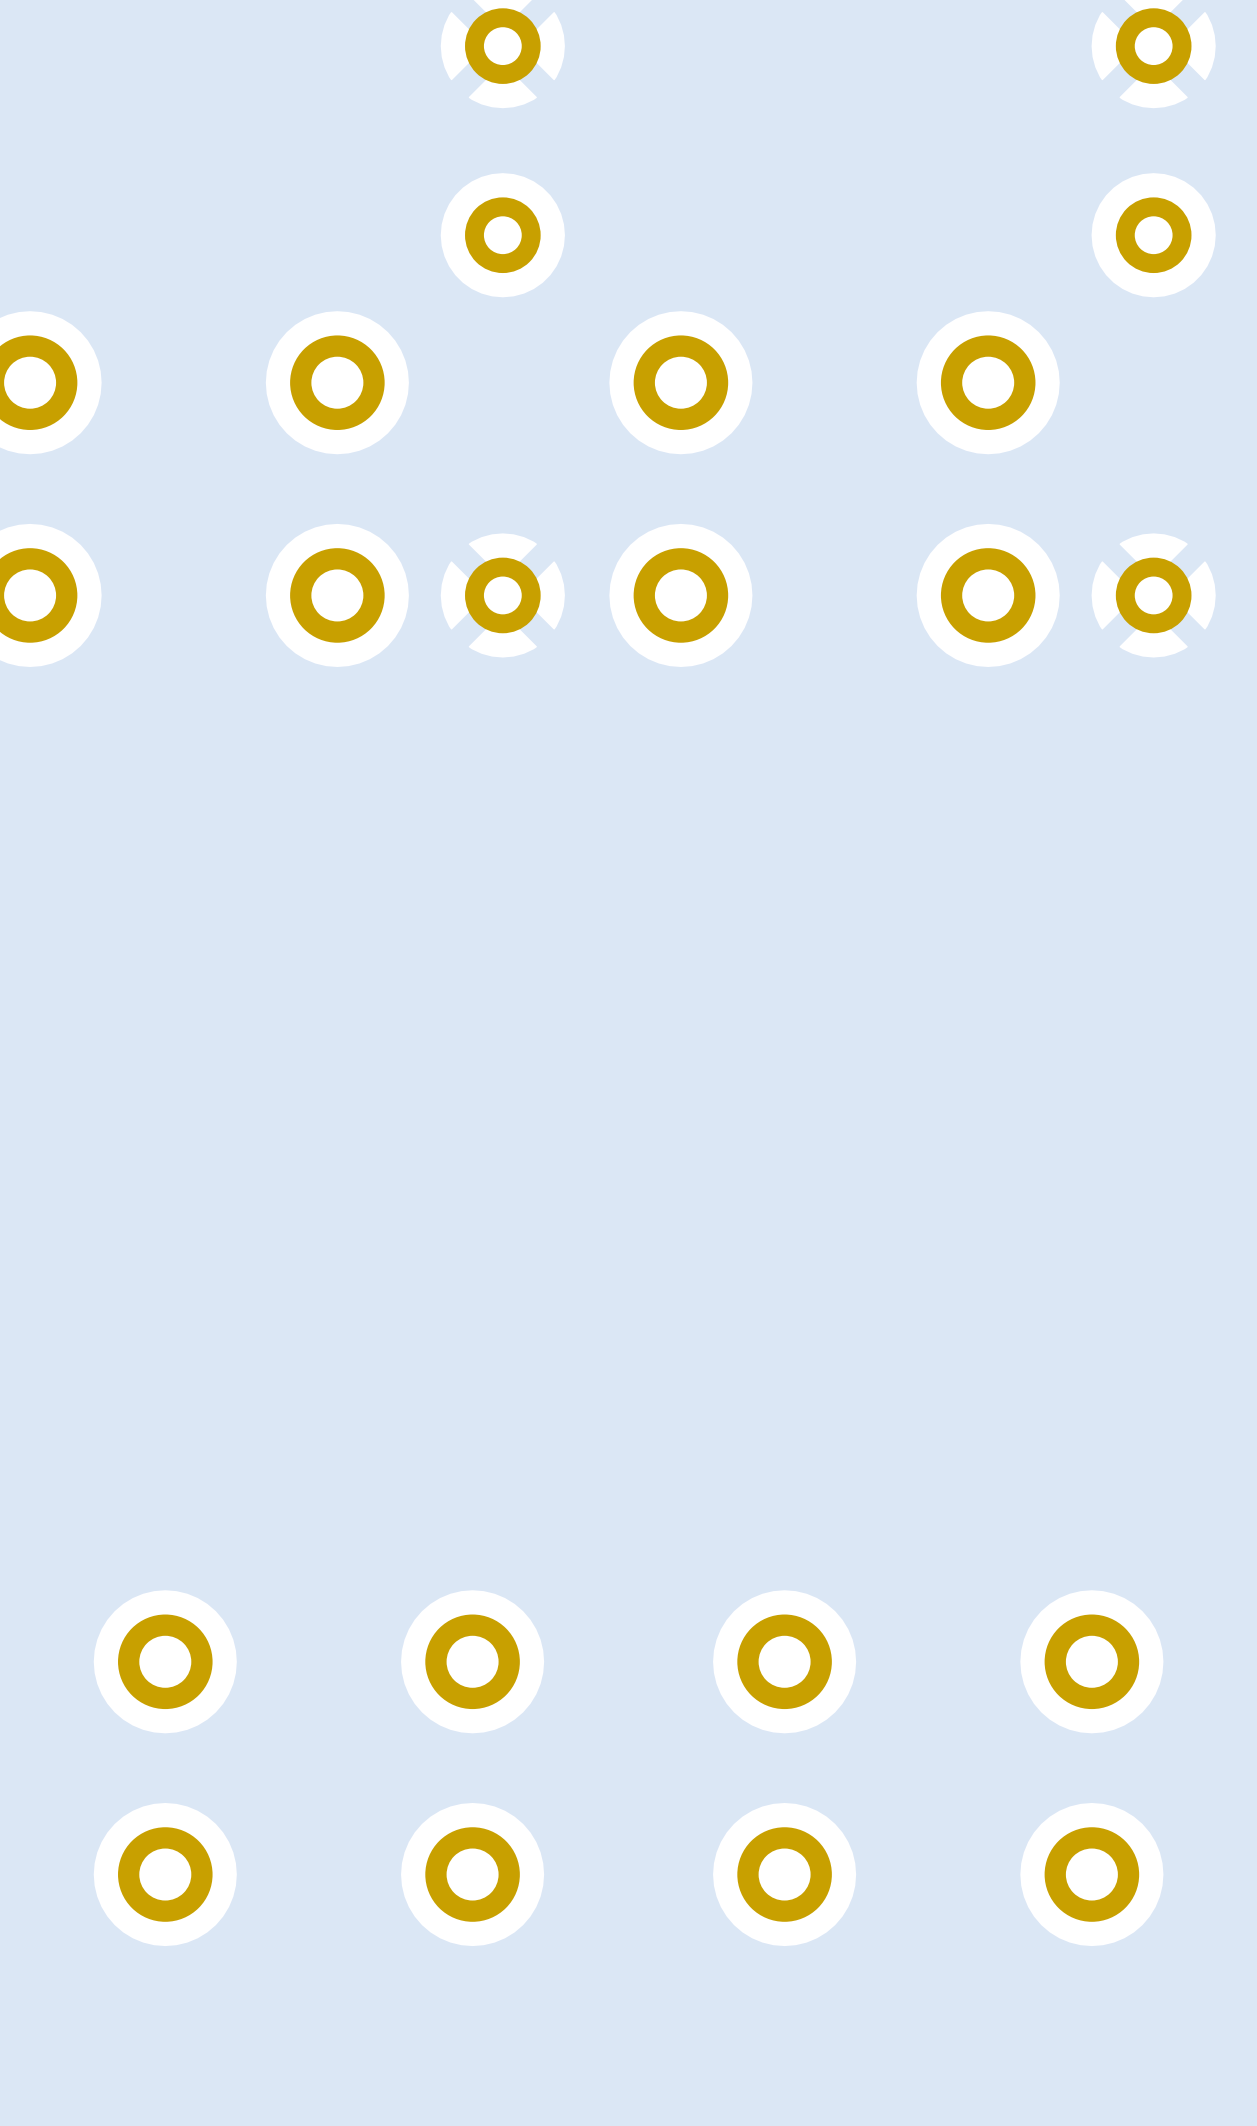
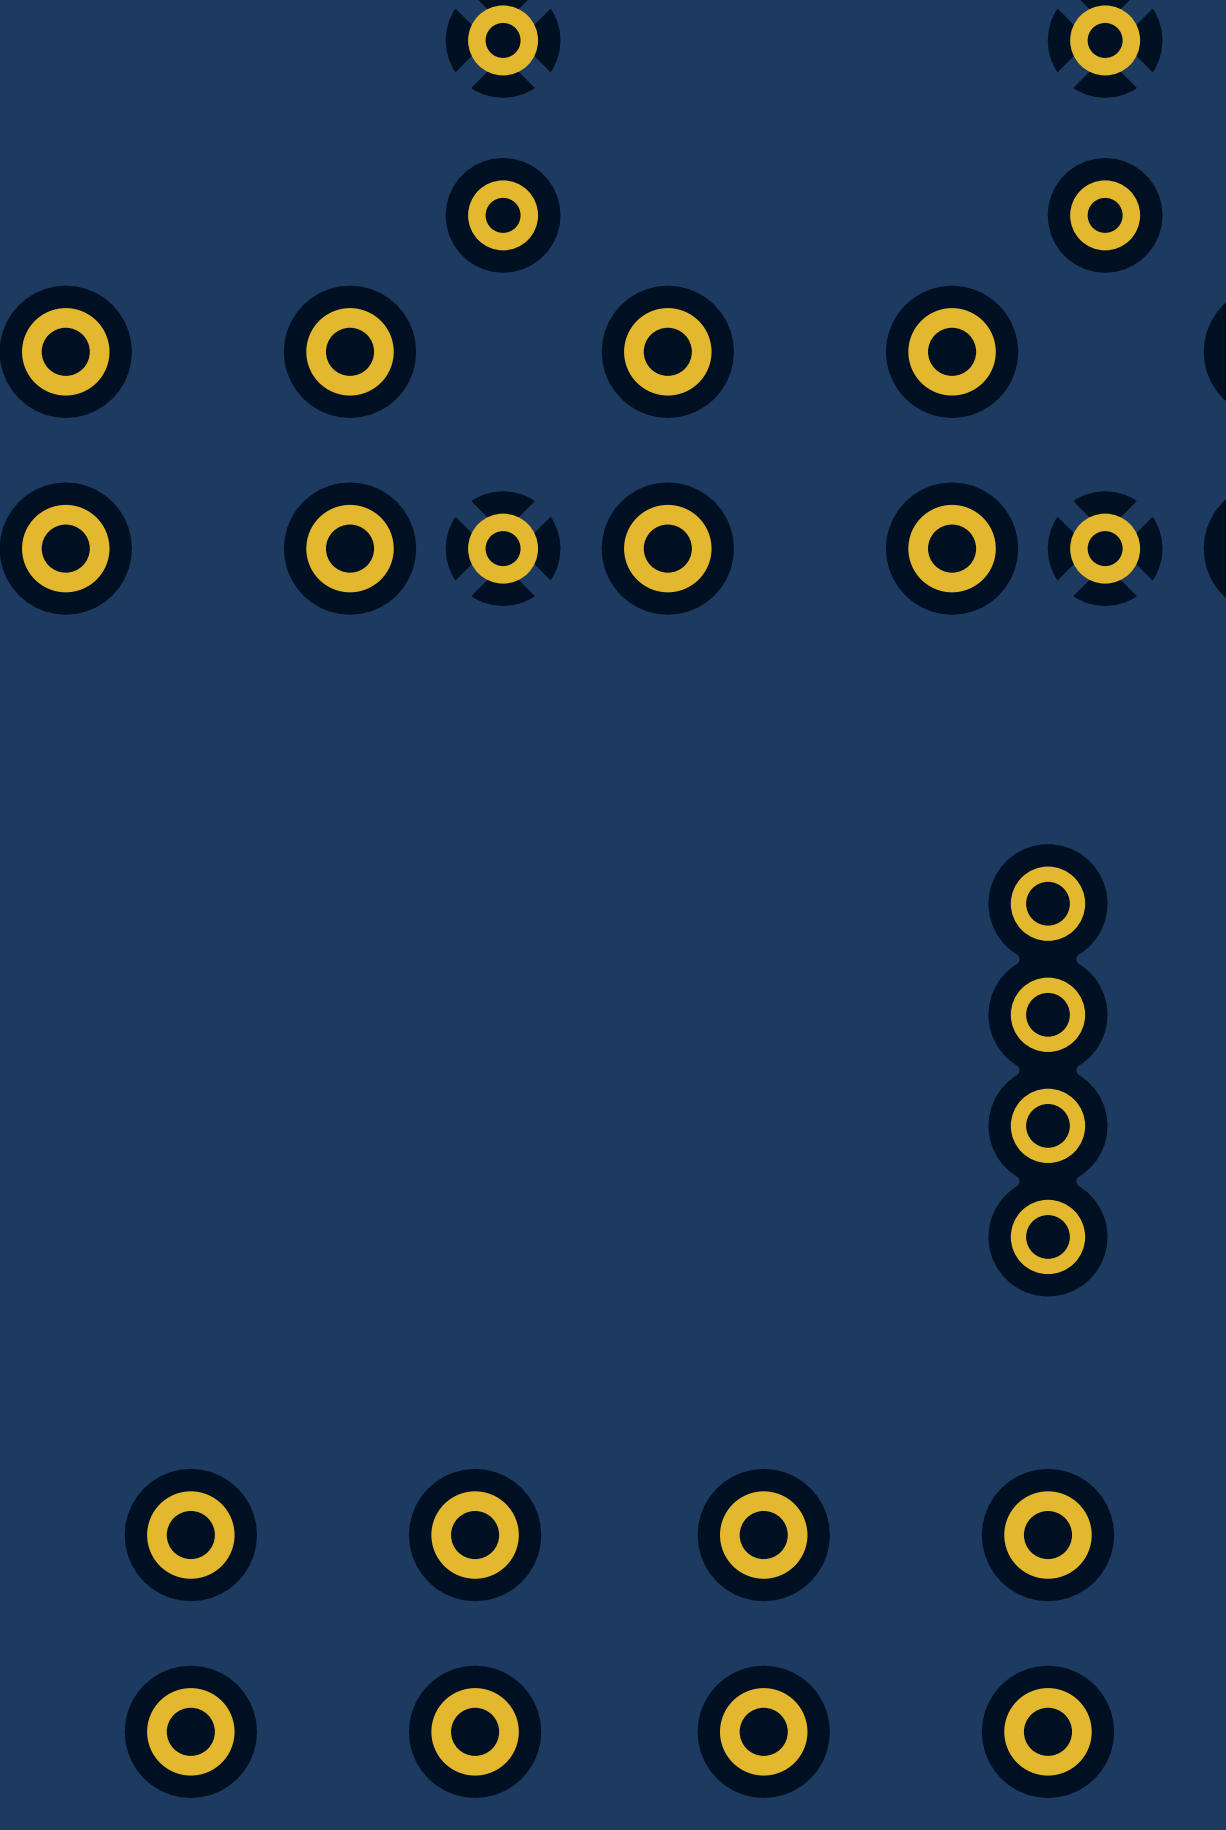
part: none -> (1047, 1070)

